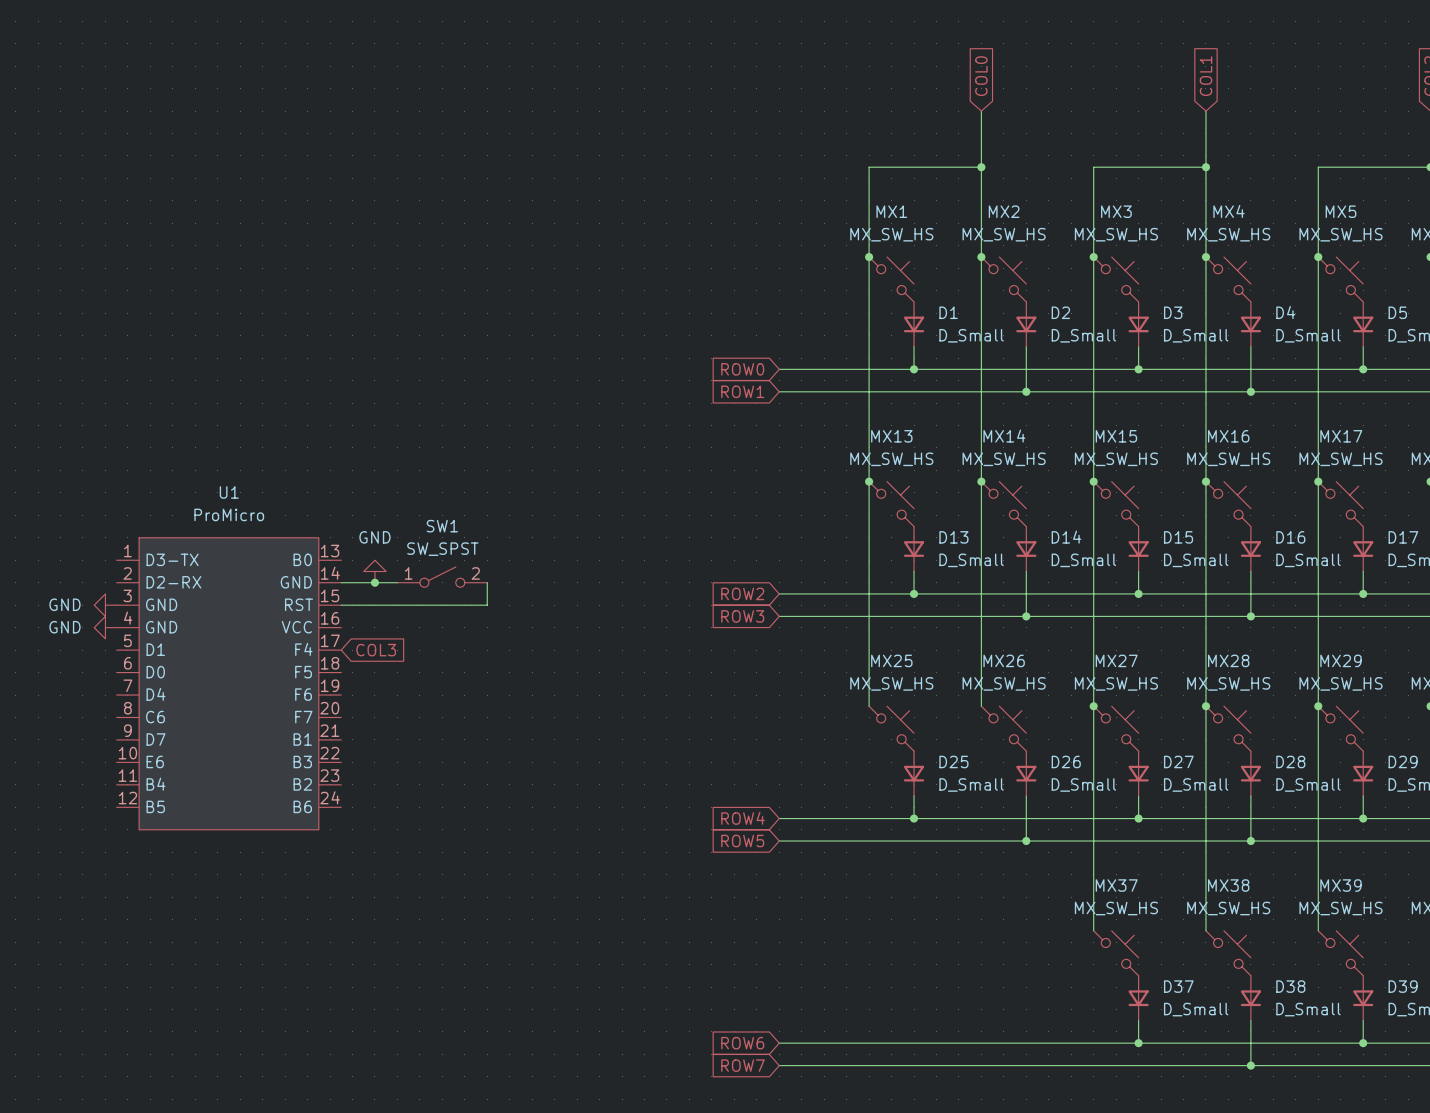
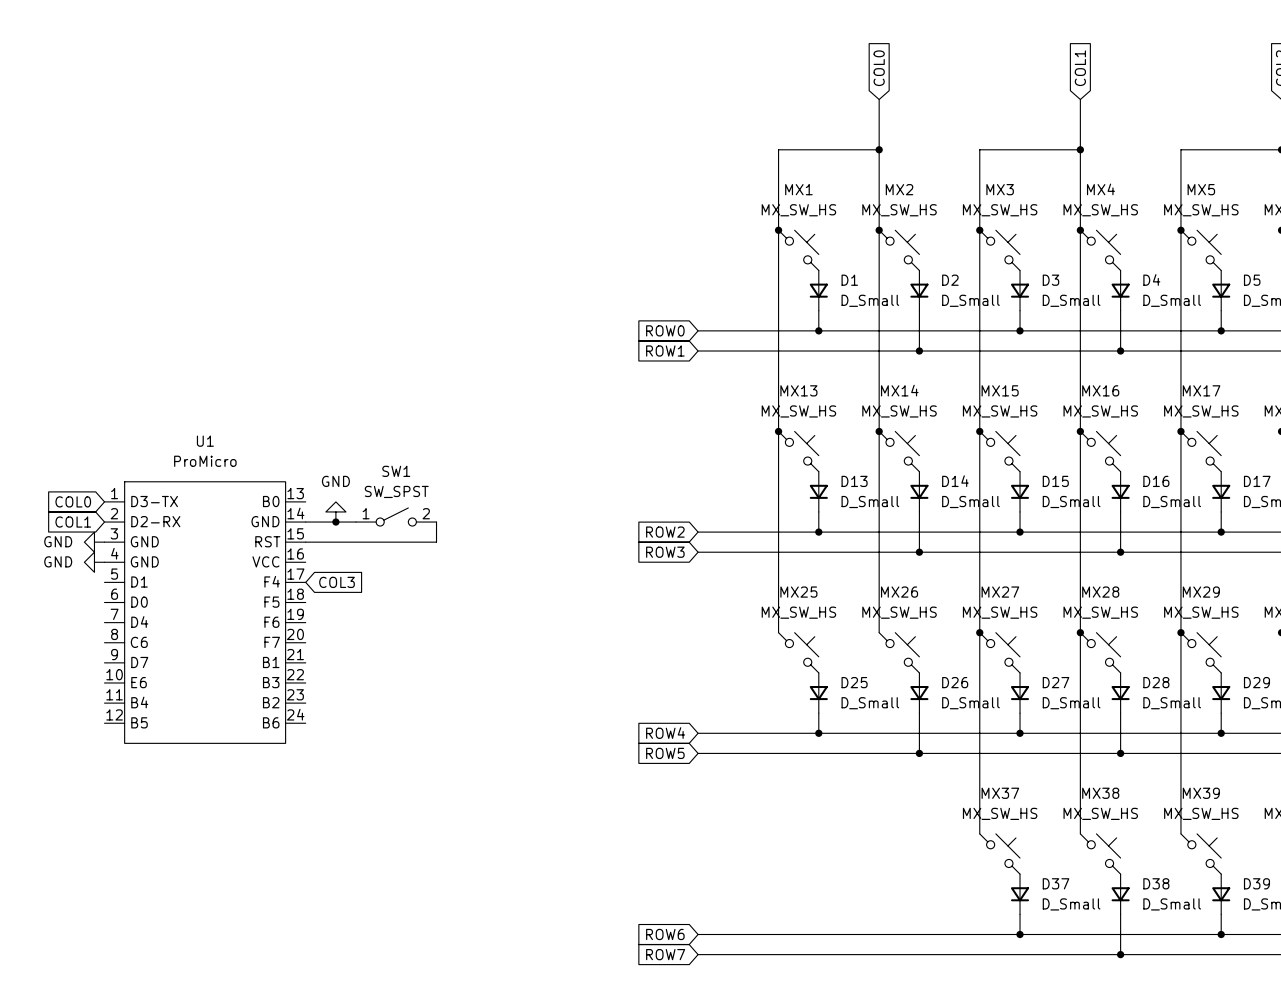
global label: none -> COL0 (73, 501)
global label: none -> COL1 (73, 522)

